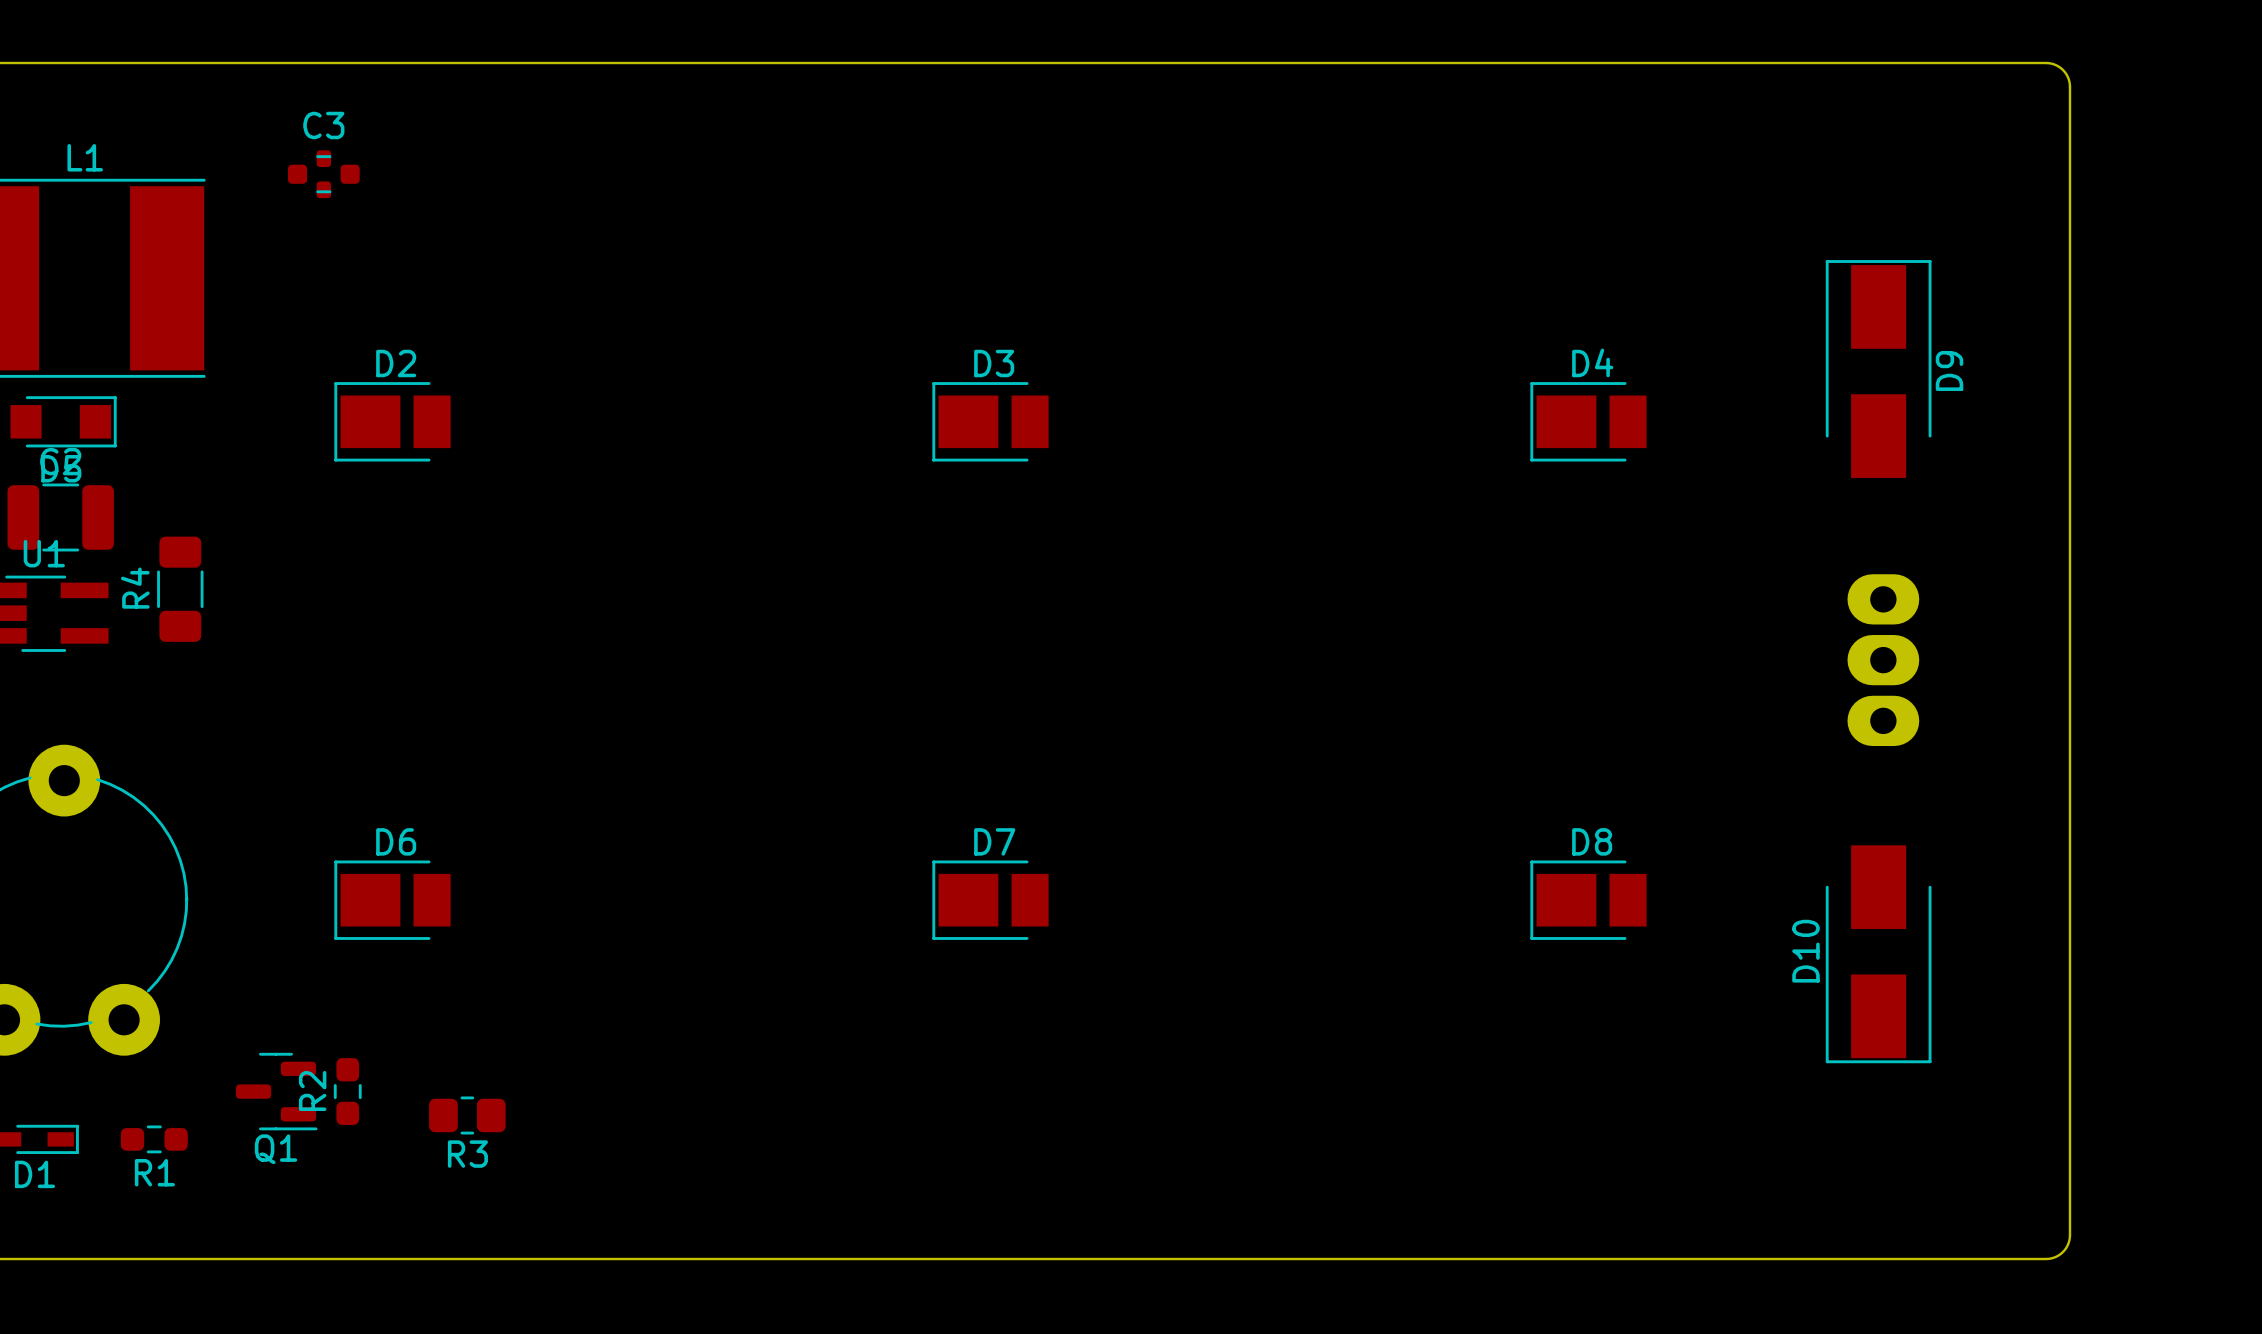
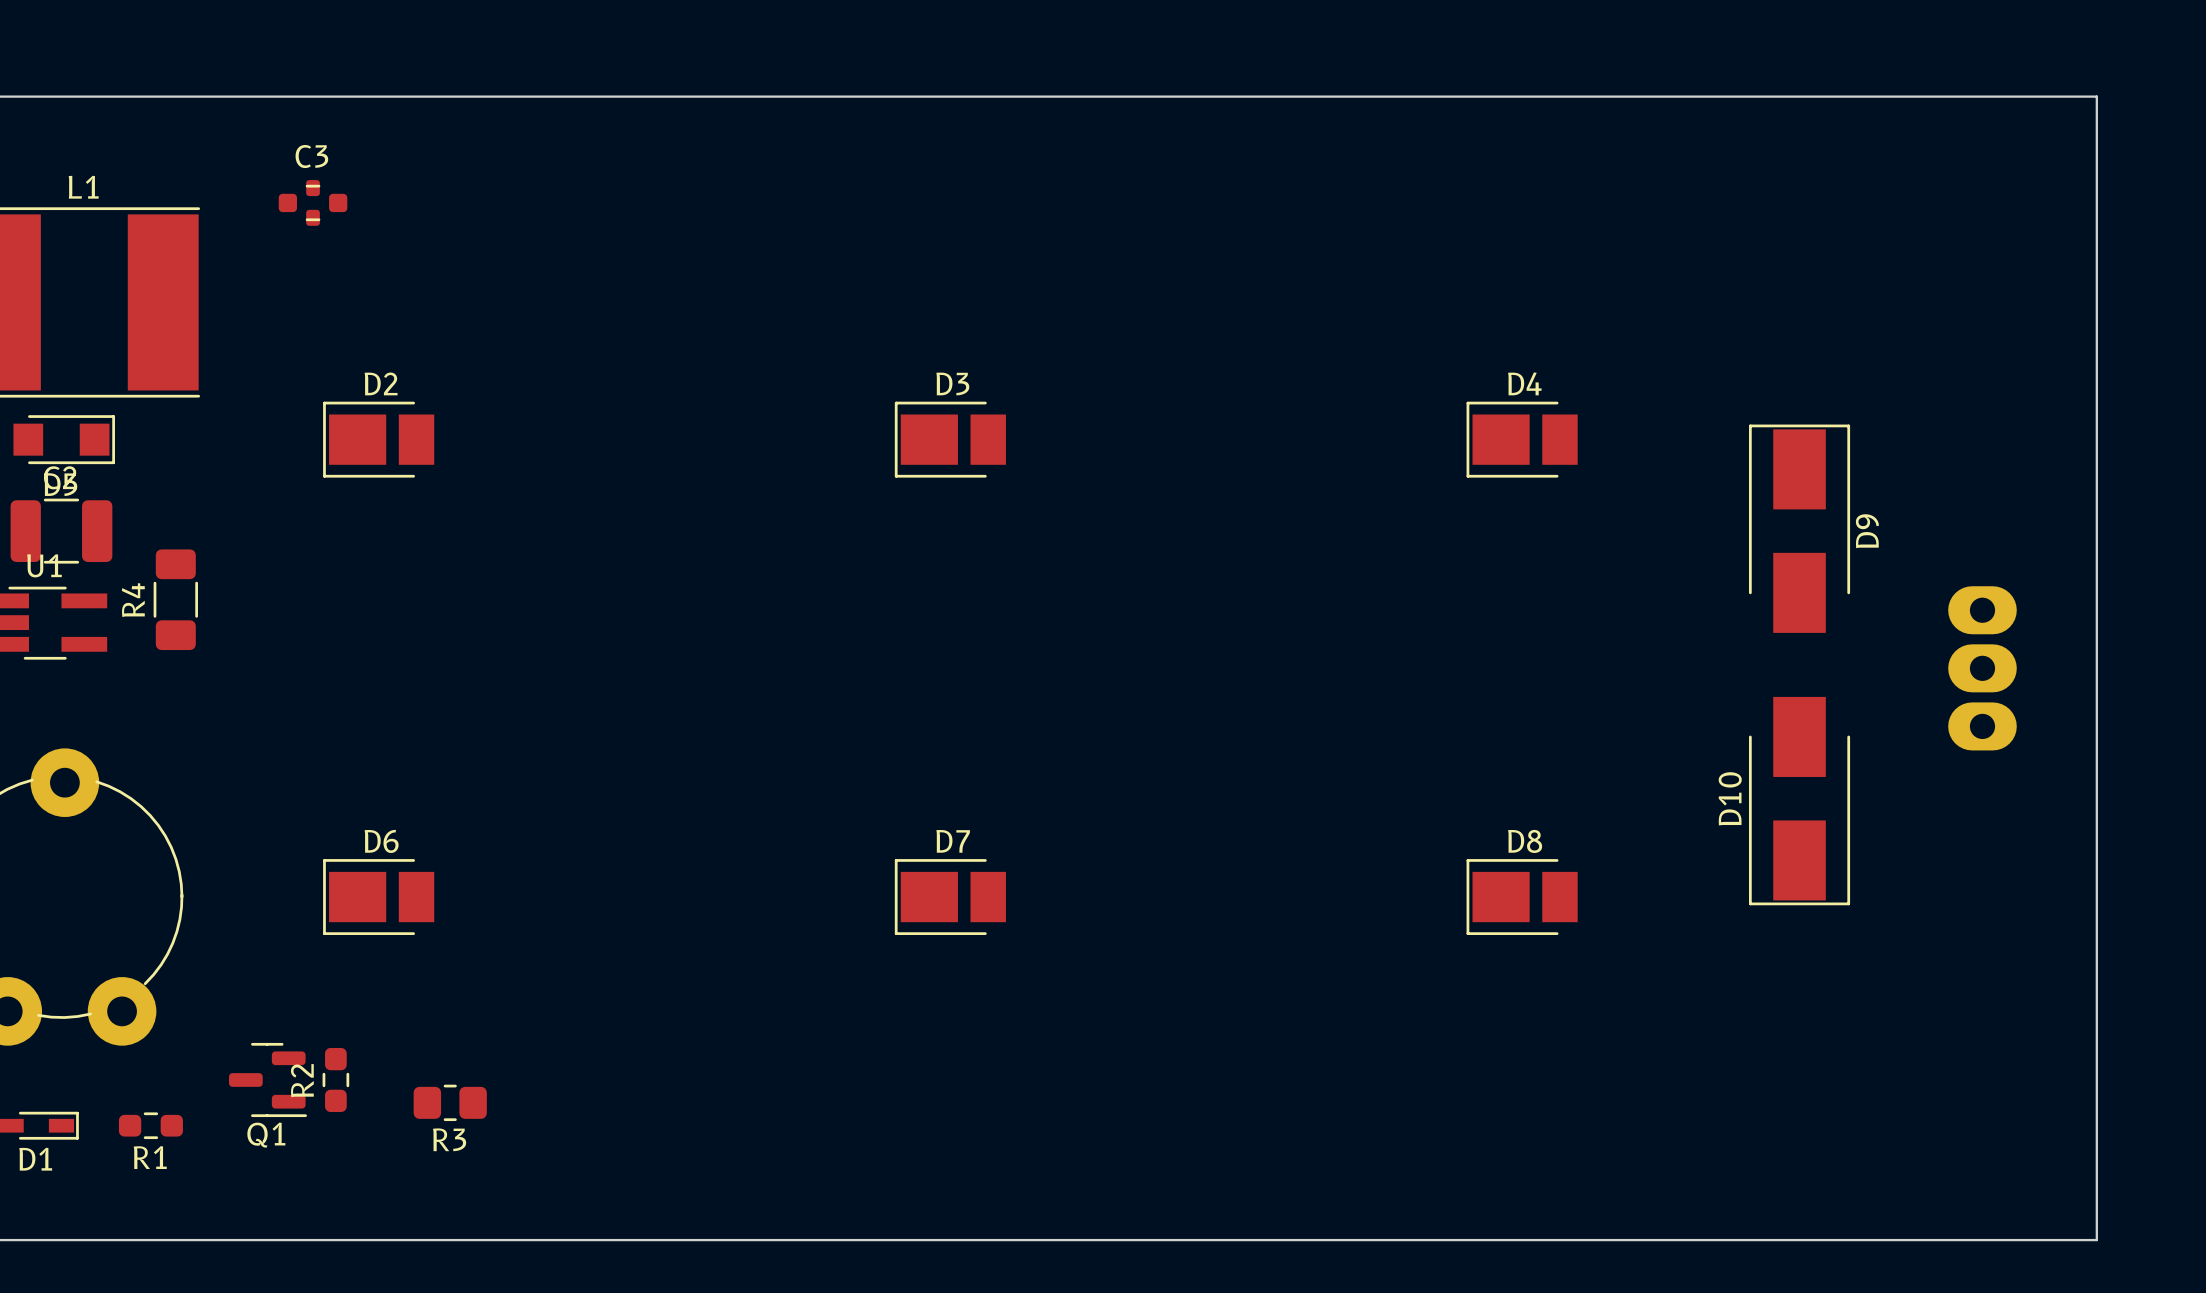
board edge: (2046, 63) (2053, 64) (2062, 70) (2068, 79) (2069, 86) (2069, 1235) (2068, 1242) (2062, 1252) (2056, 1256) (2046, 1259) -> (1959, 96) (2096, 96) (2096, 1240) (1959, 1240)
D9 position: (1878, 369) -> (1799, 528)
part position: (1883, 660) -> (1982, 668)
D10 position: (1878, 954) -> (1799, 801)

